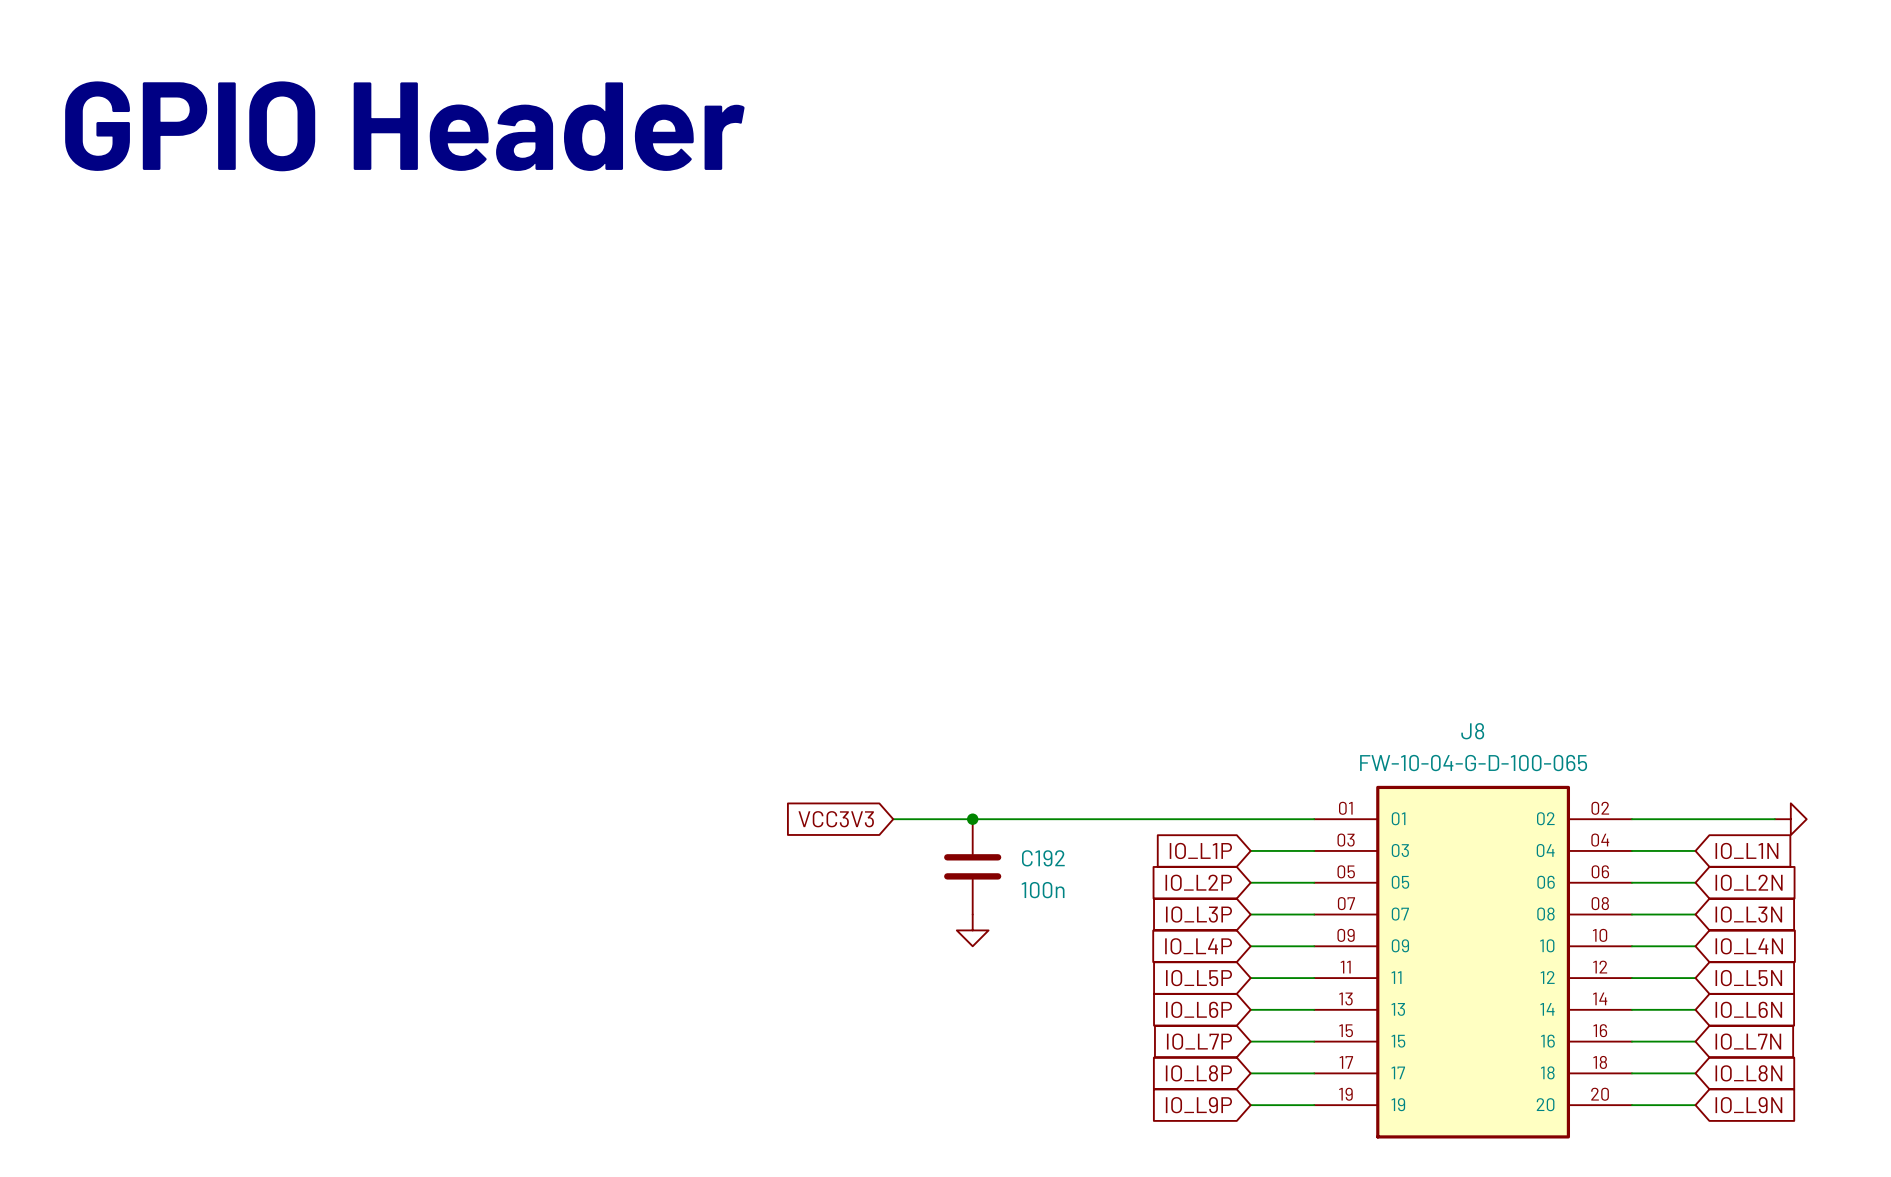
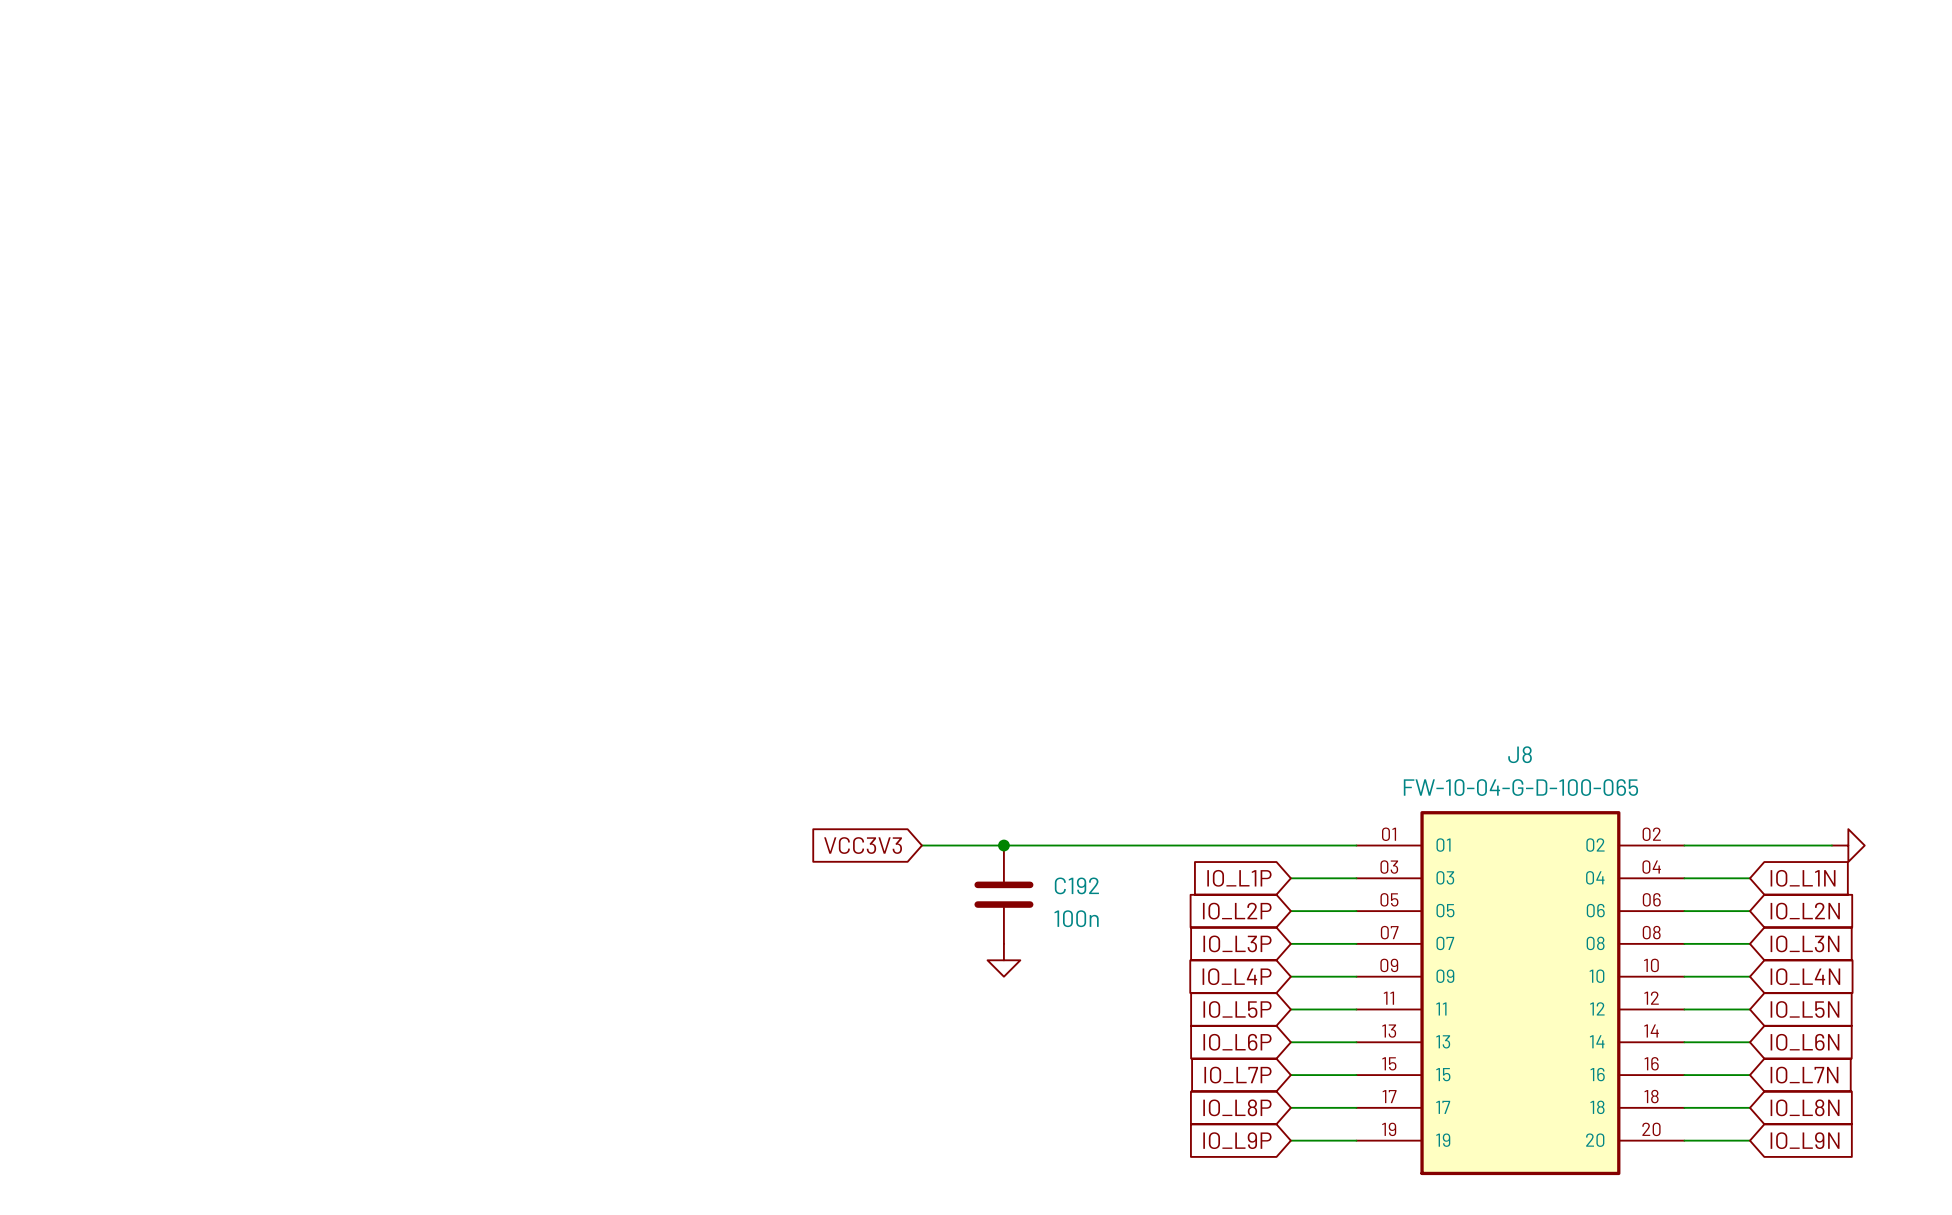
text: GPIO Header (404, 126) -> none

